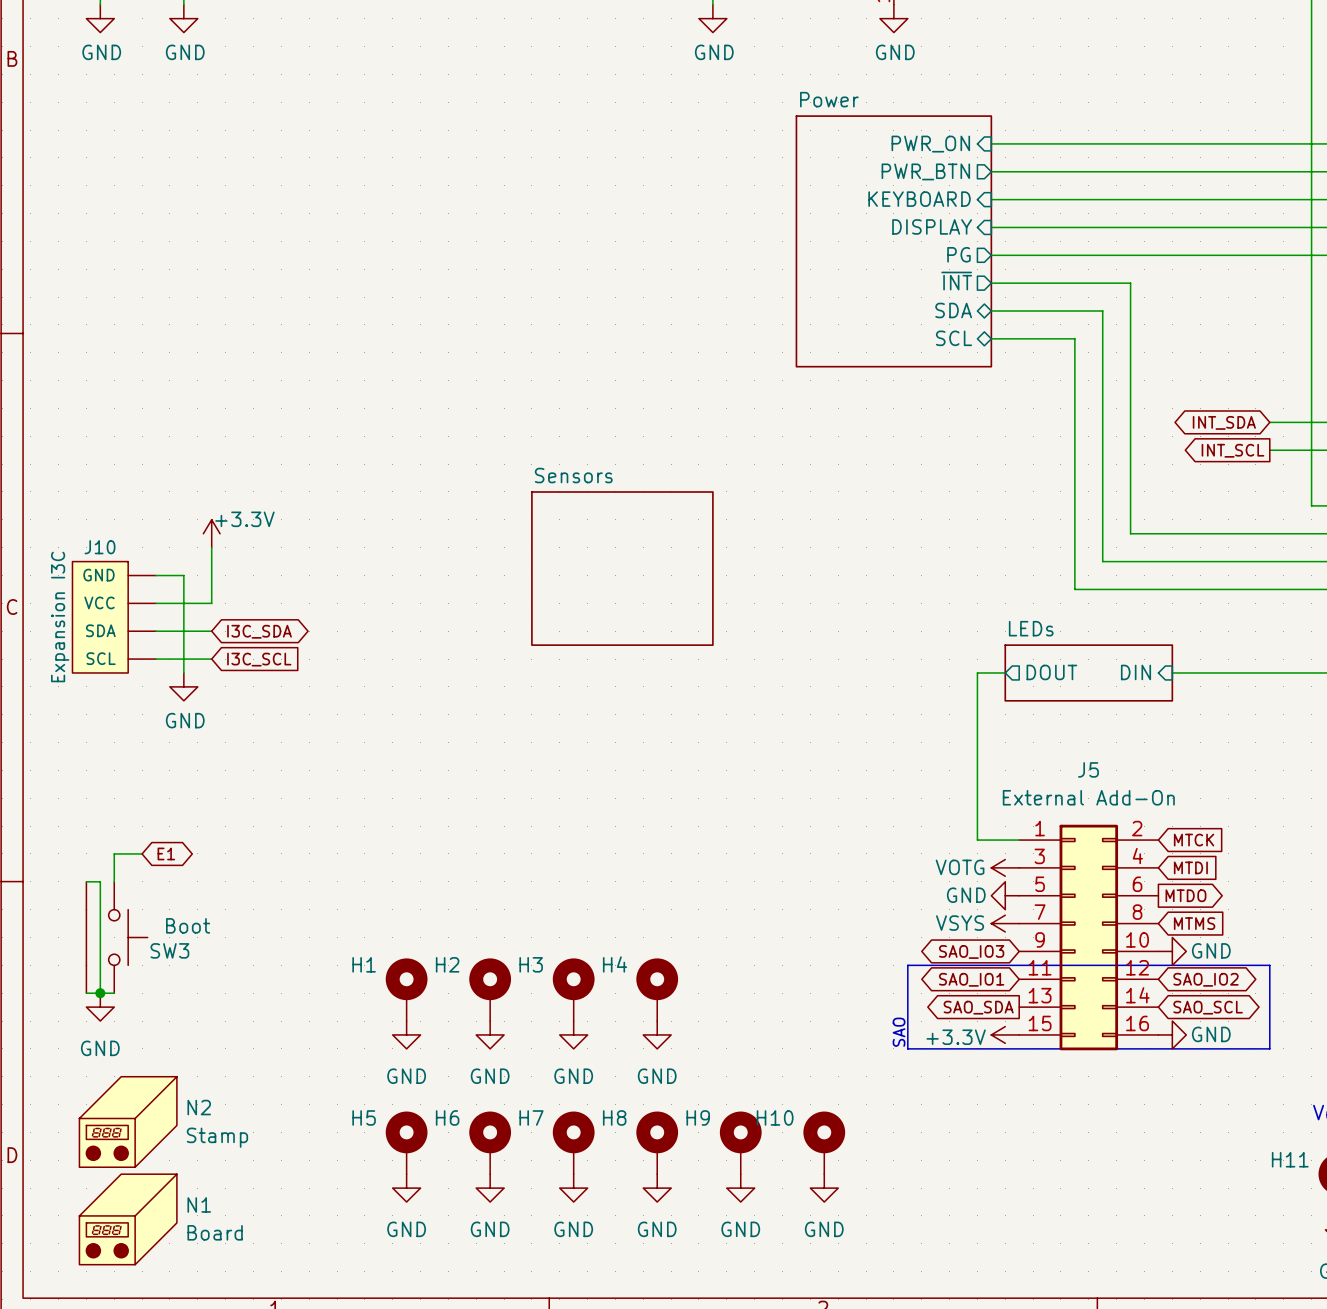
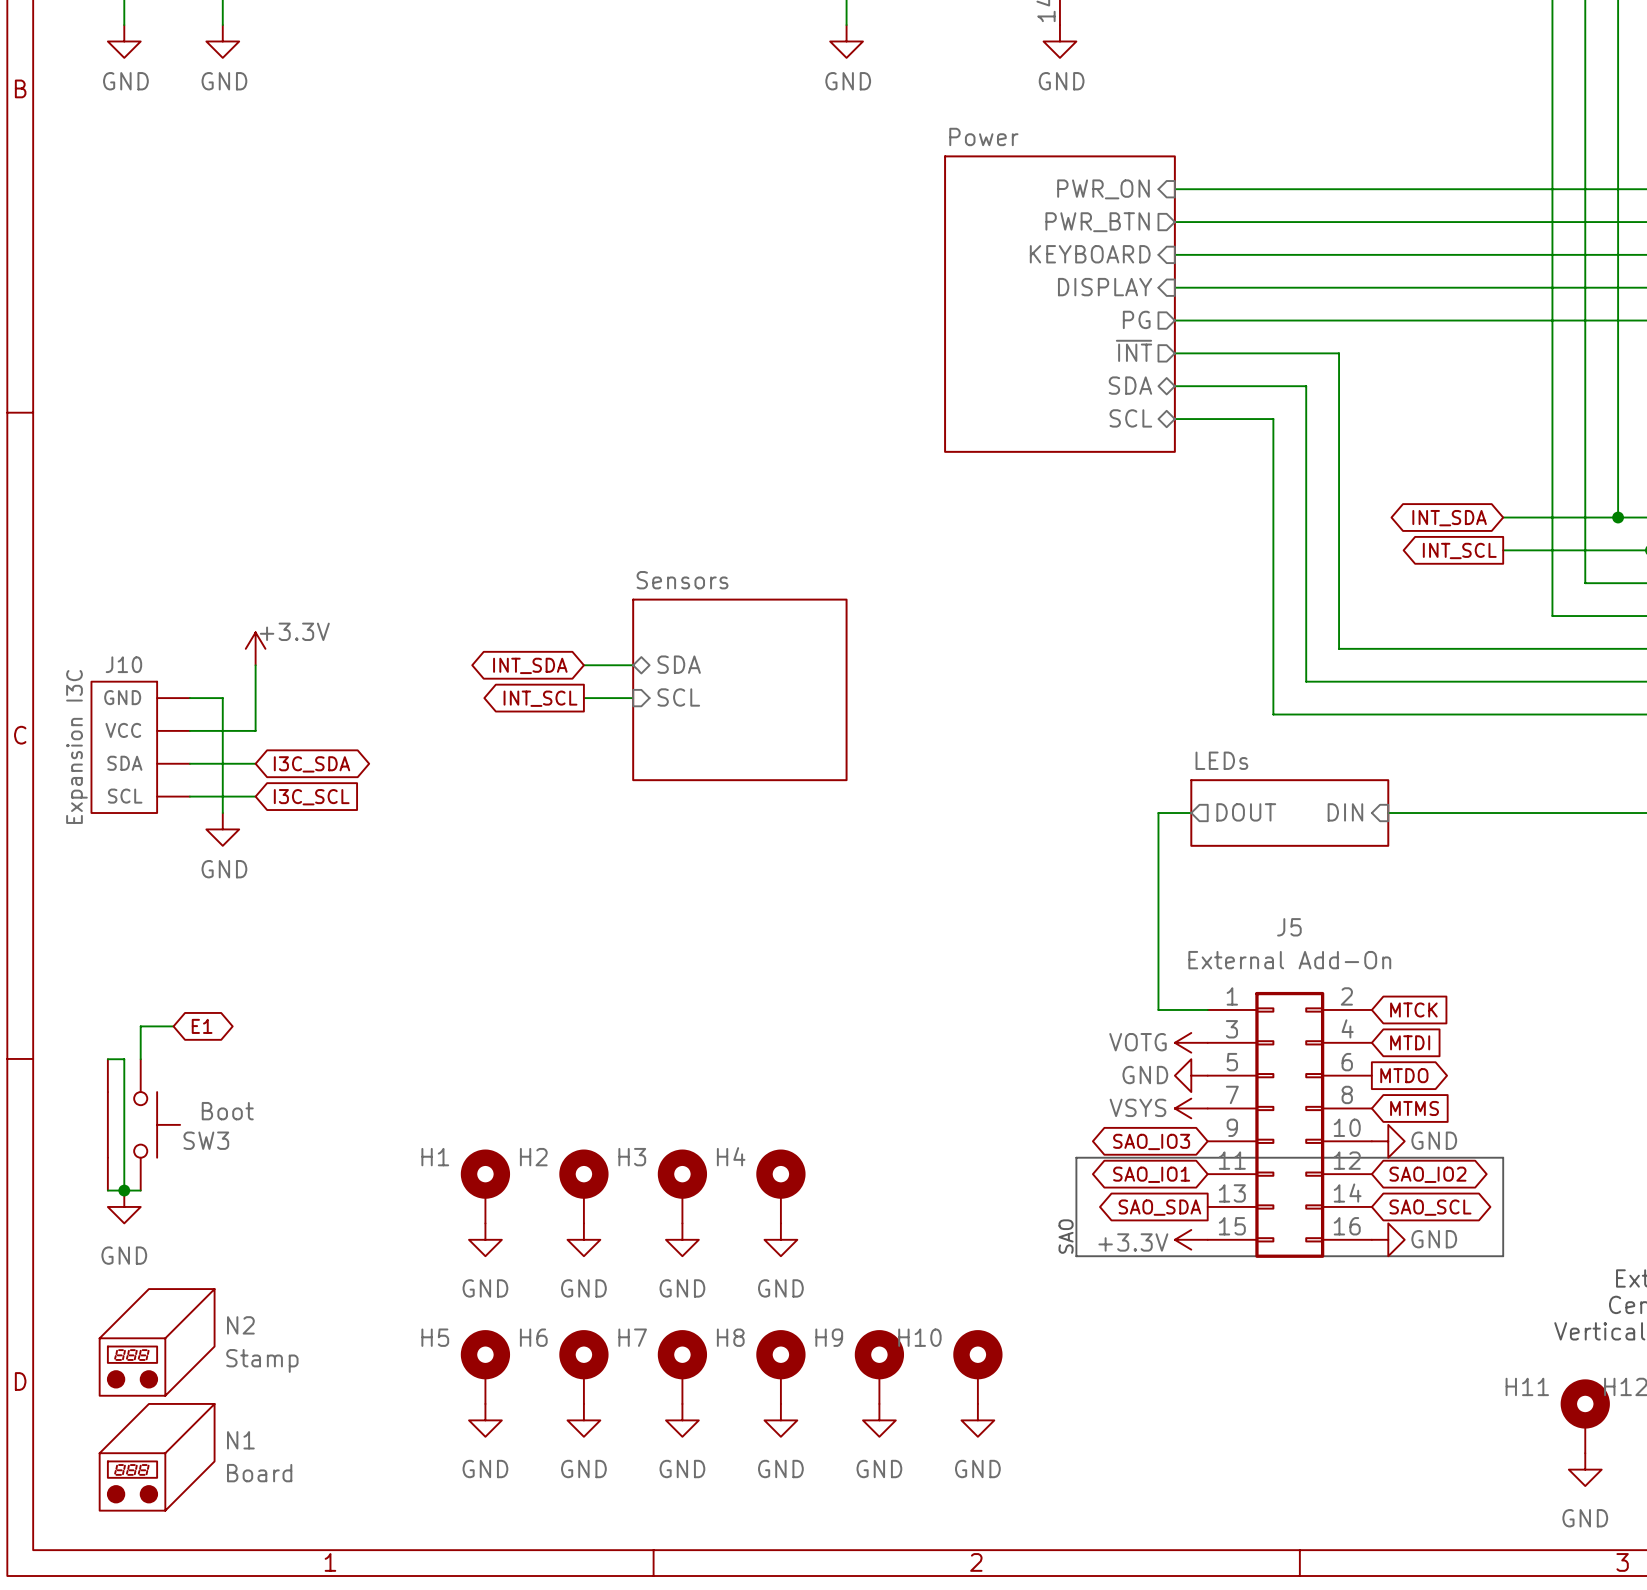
wire: none -> (583, 665) (633, 665)
sheet pin: none -> SDA (679, 664)
global label: none -> INT_SDA (530, 665)
wire: none -> (583, 698) (633, 698)
sheet pin: none -> SCL (678, 697)
global label: none -> INT_SCL (540, 698)

